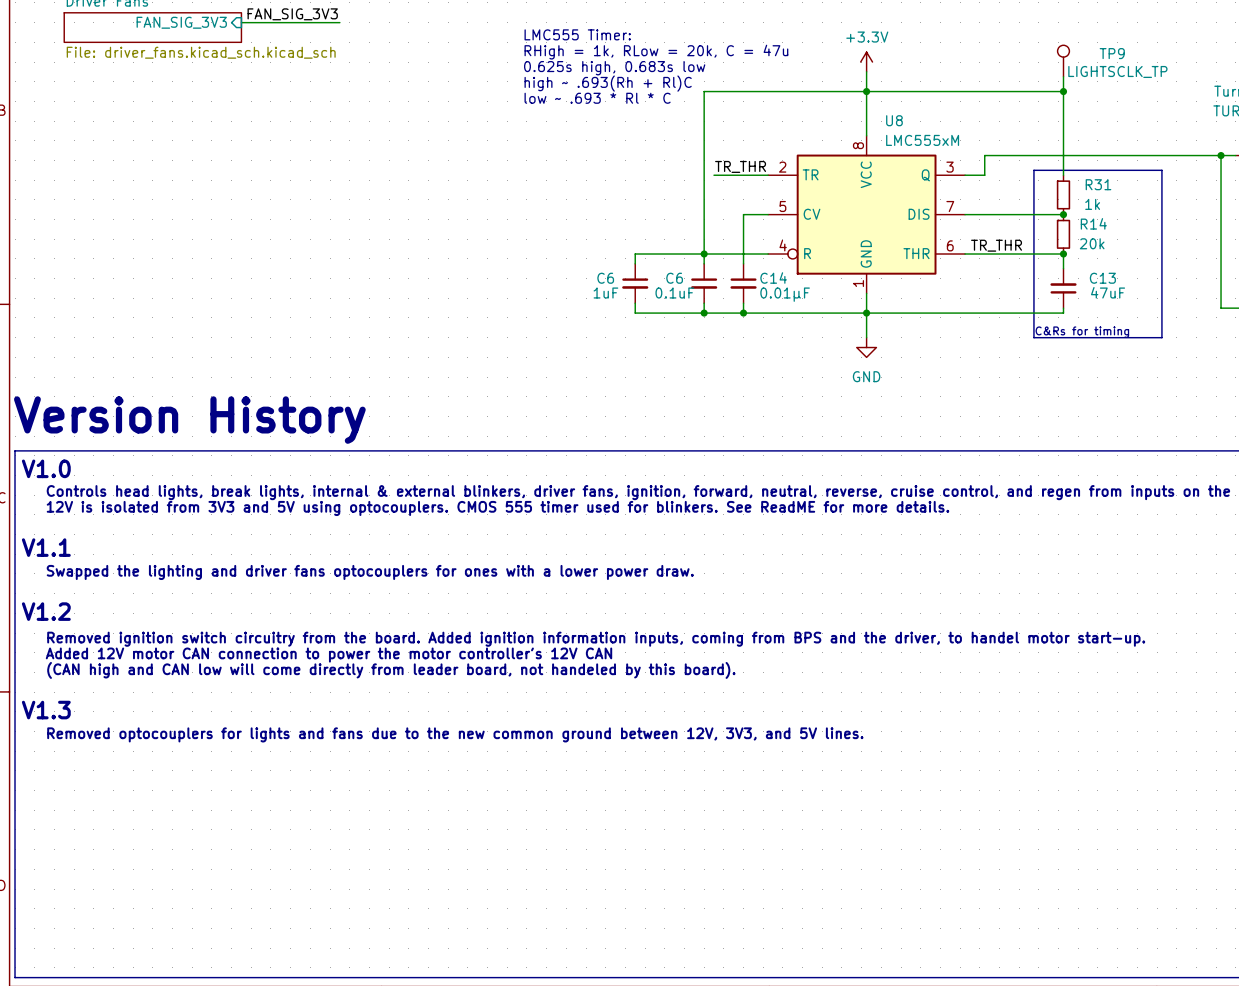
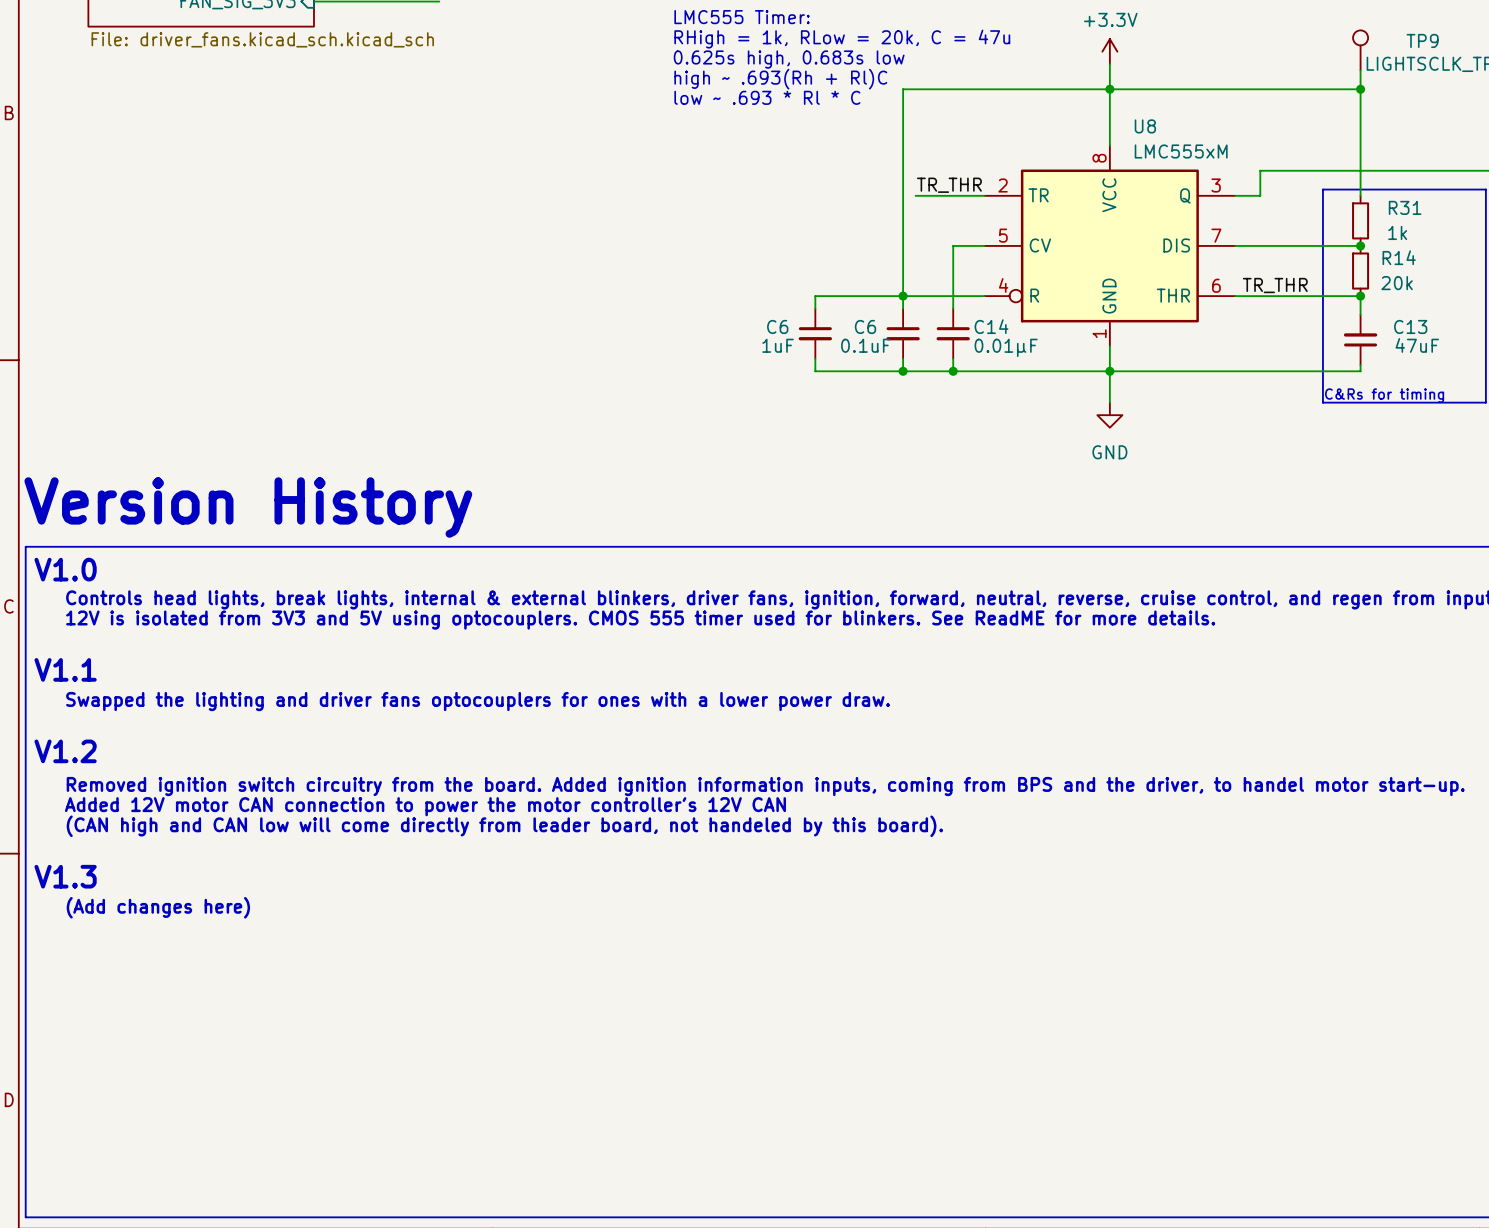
text: Removed optocouplers for lights and fans due to the new common ground between 12V, 3V3, and 5V lines. (455, 734) -> (Add changes here) (158, 907)

